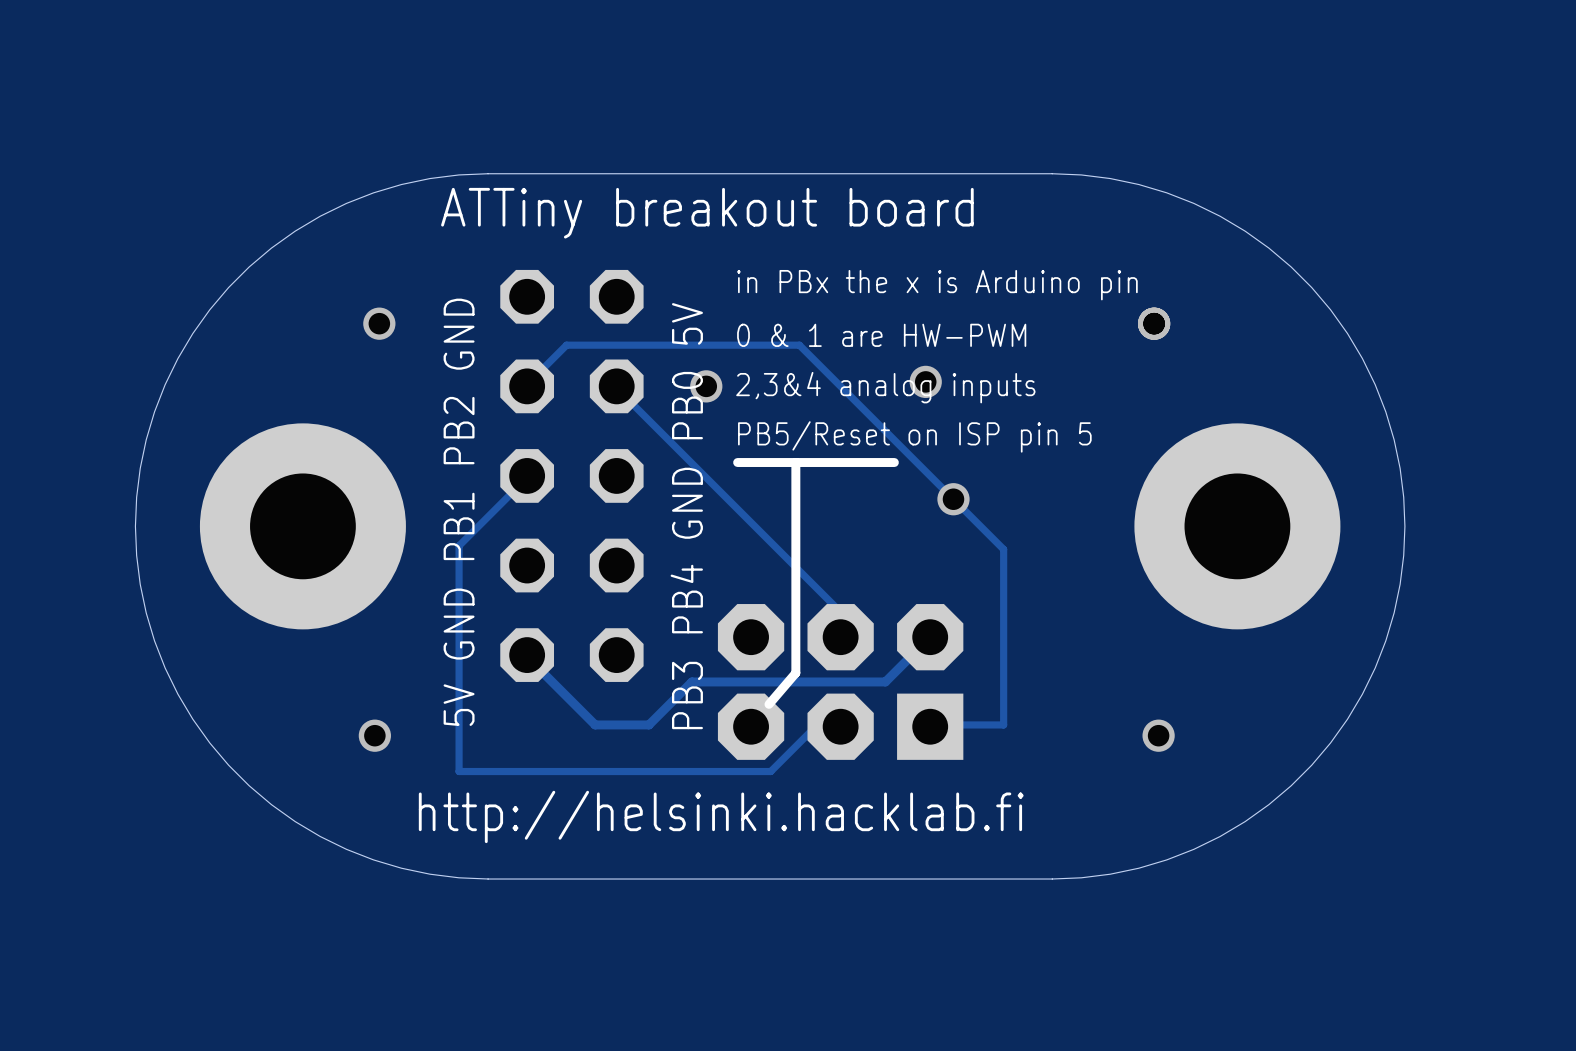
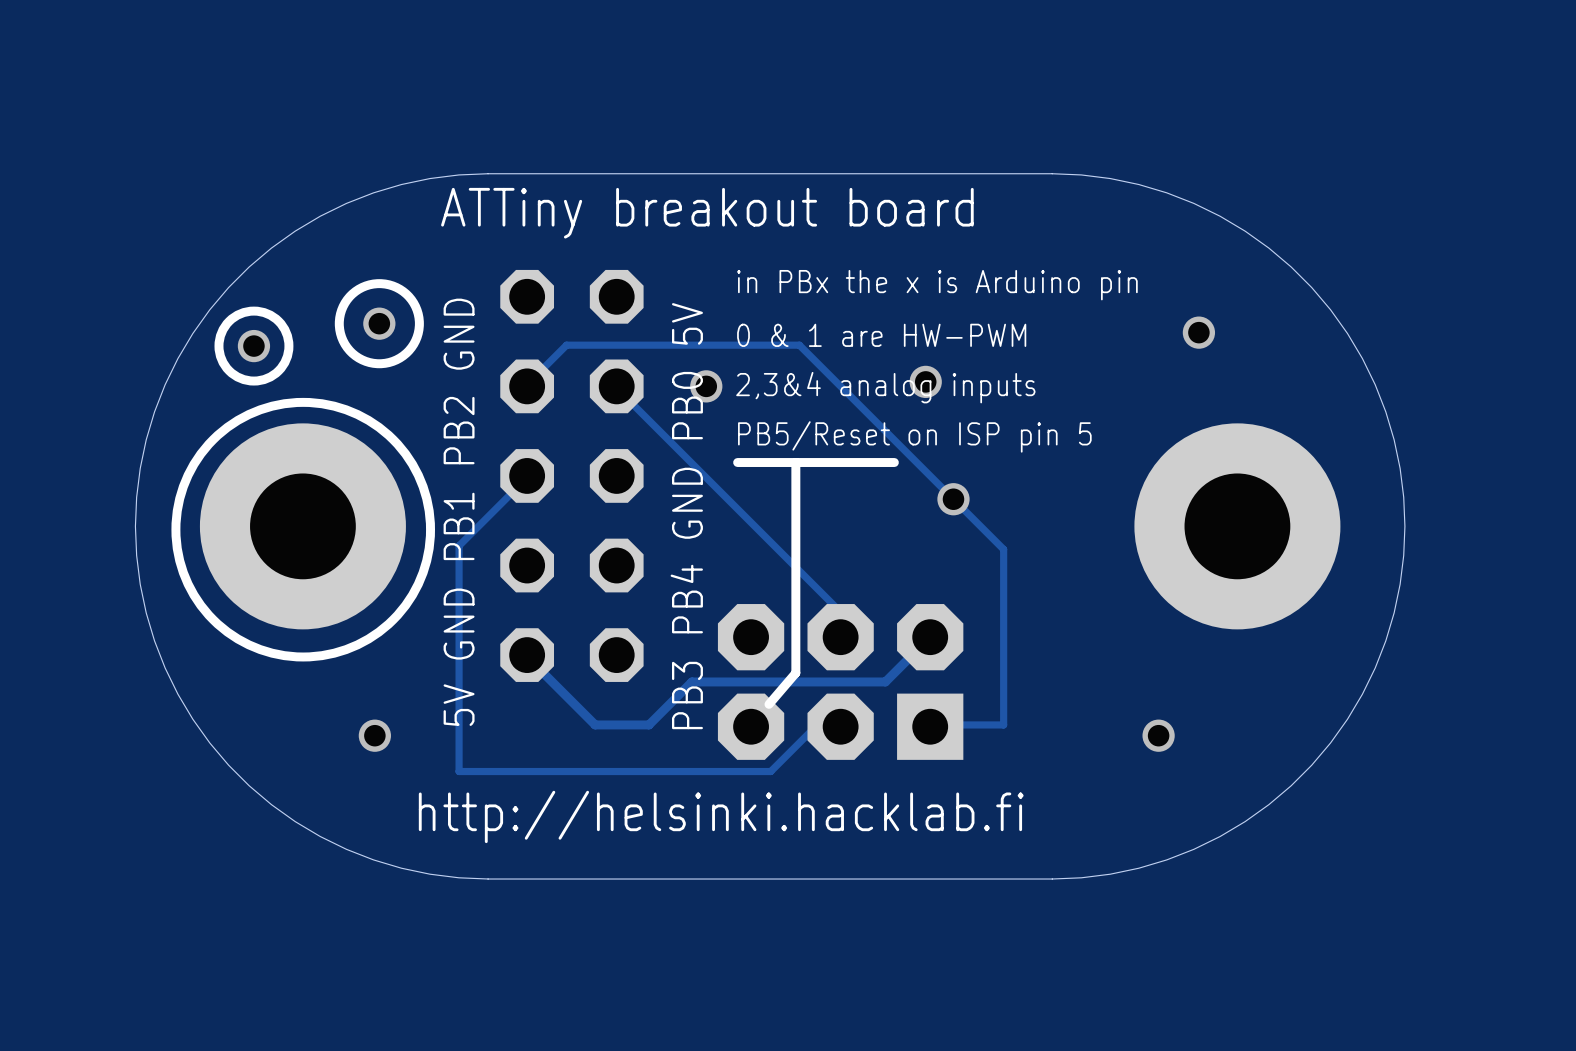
drawing: none -> [171, 279, 435, 662]
via position: (1154, 323) -> (1198, 332)
via: none -> (253, 346)

